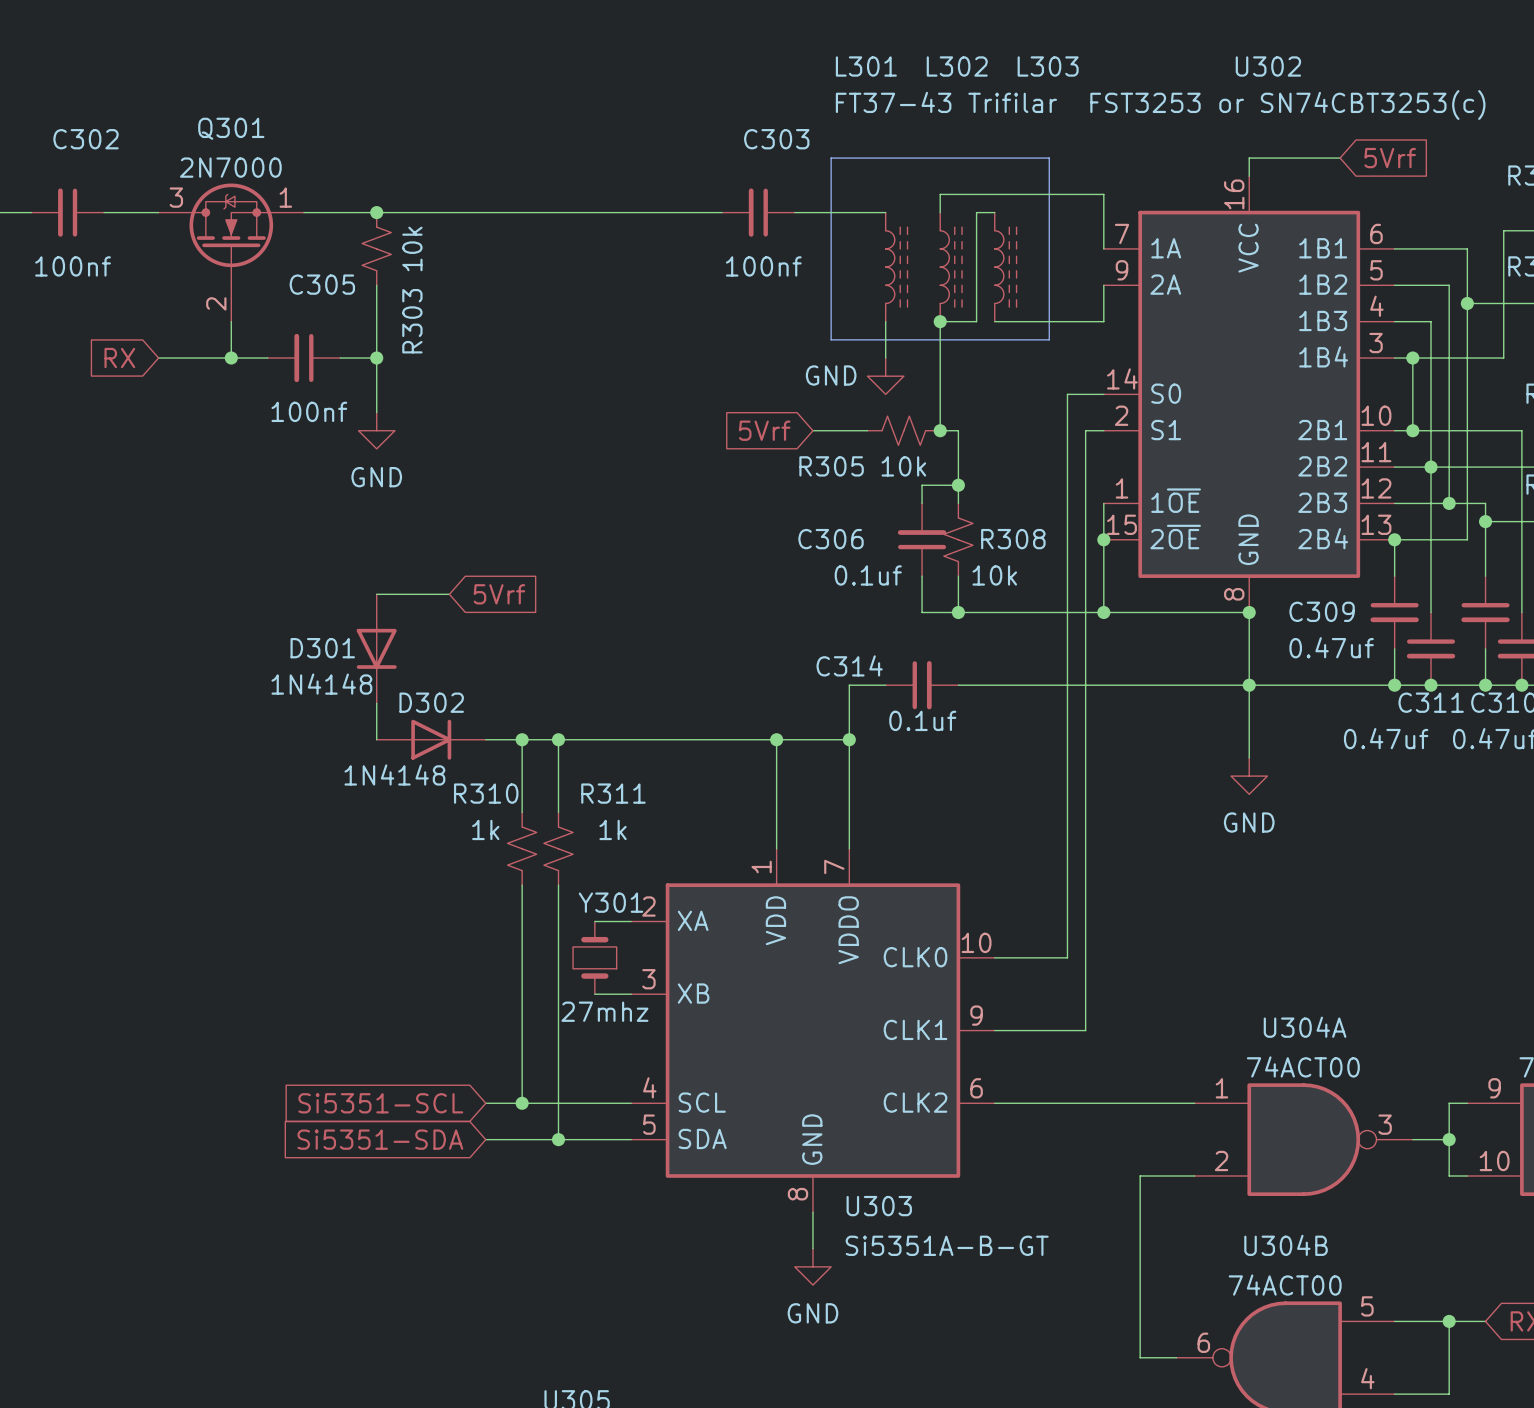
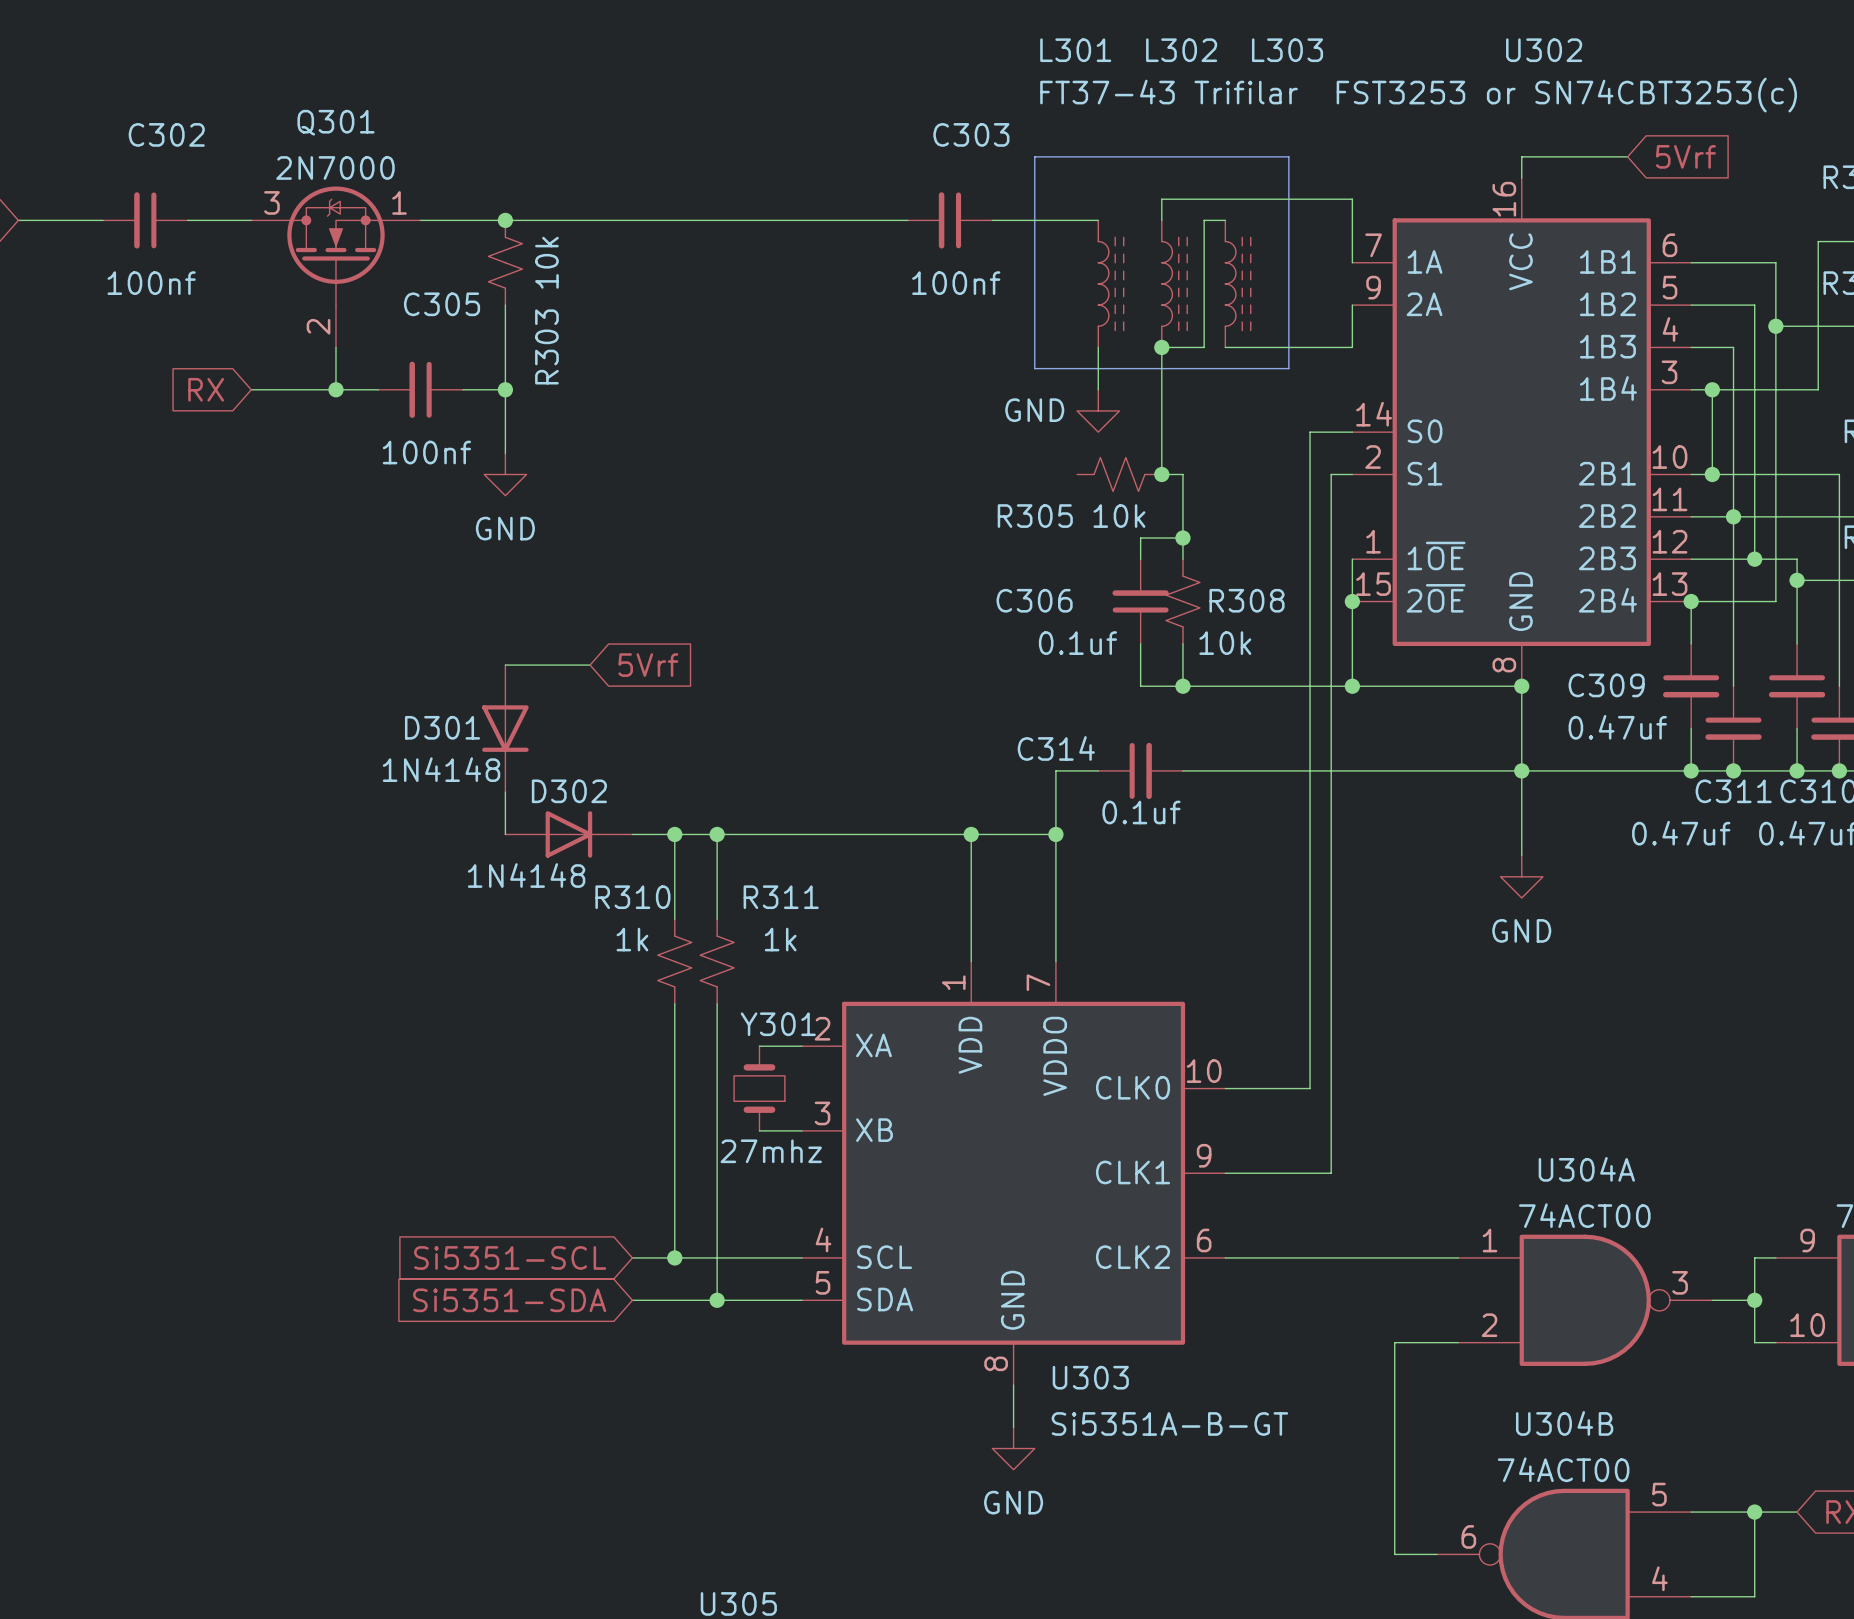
global label: 5Vrf (764, 430) -> none
wire: (812, 430) (867, 430) -> none

